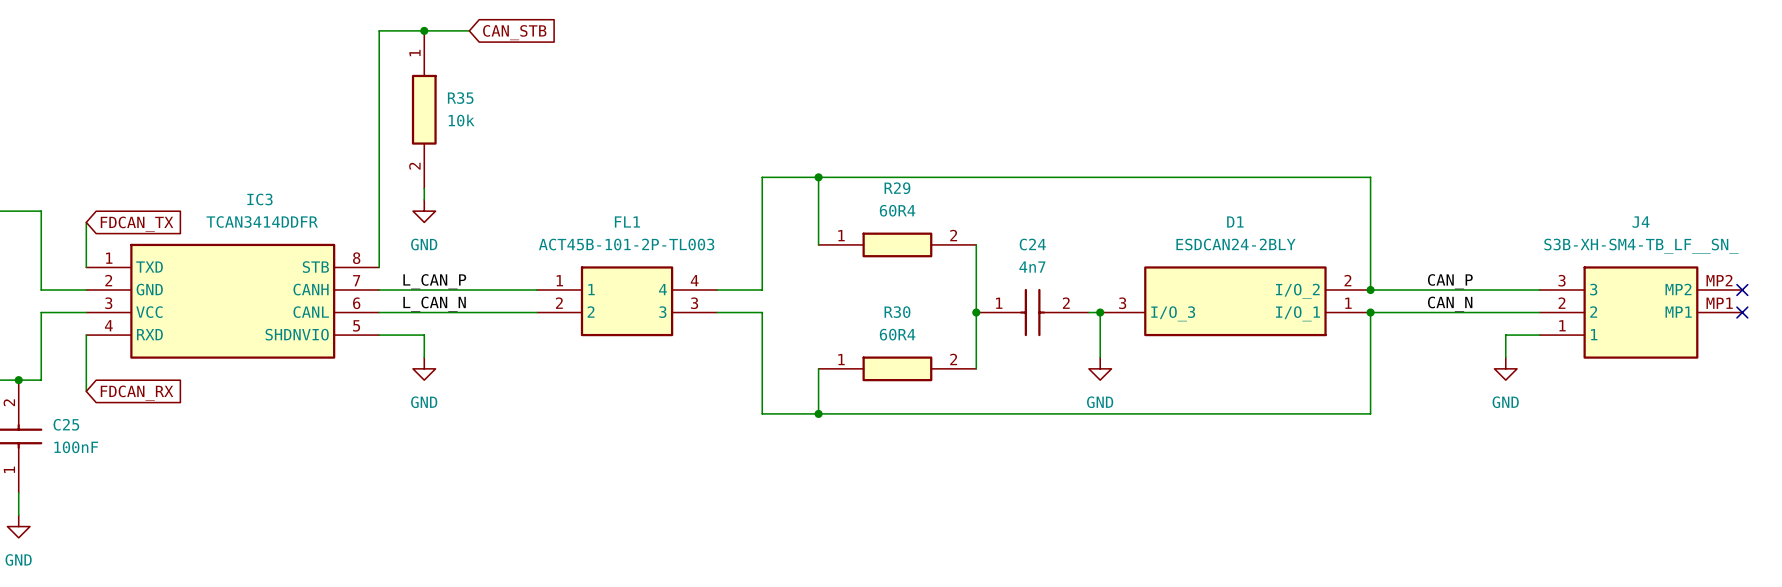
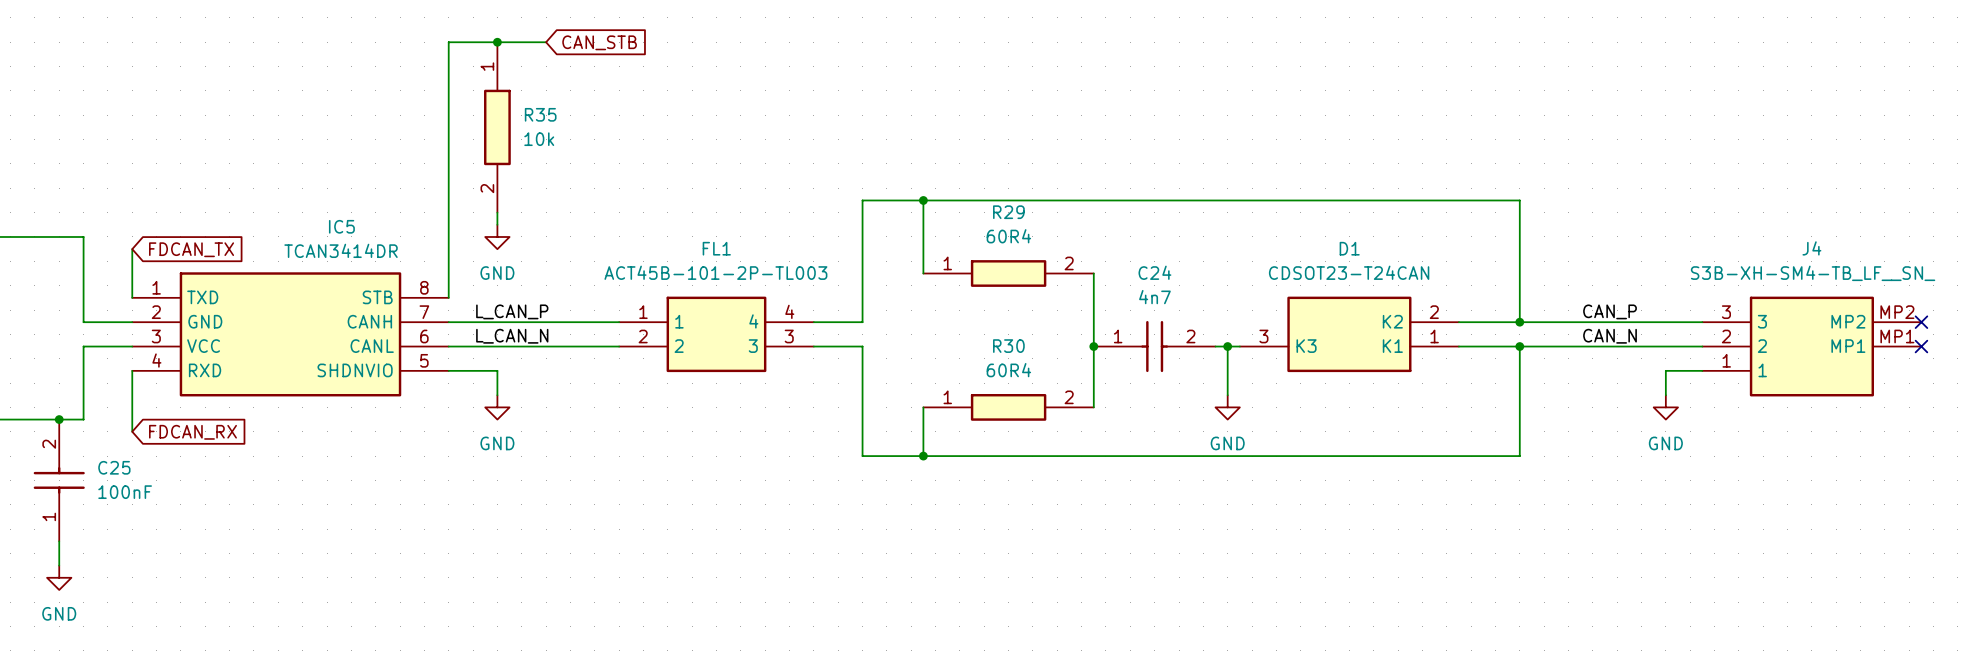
IC3 name: IC3 (259, 199) -> IC5 (341, 226)
IC3 value: TCAN3414DDFR (262, 222) -> TCAN3414DR (341, 250)
D1 value: ESDCAN24-2BLY (1236, 244) -> CDSOT23-T24CAN (1349, 272)
D1 symbol: [1100, 266, 1371, 337] -> [1239, 296, 1459, 373]

